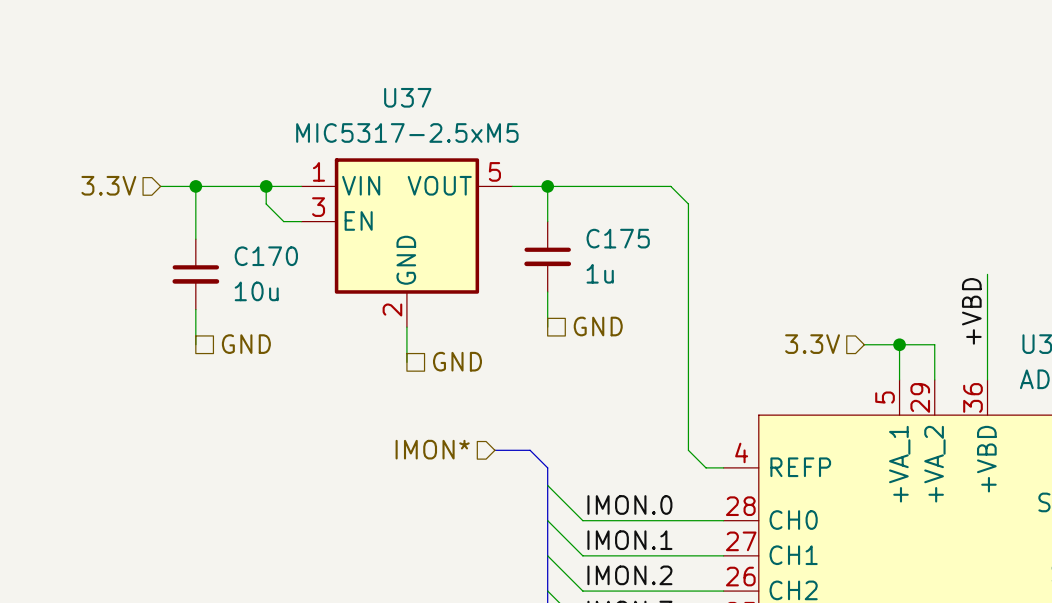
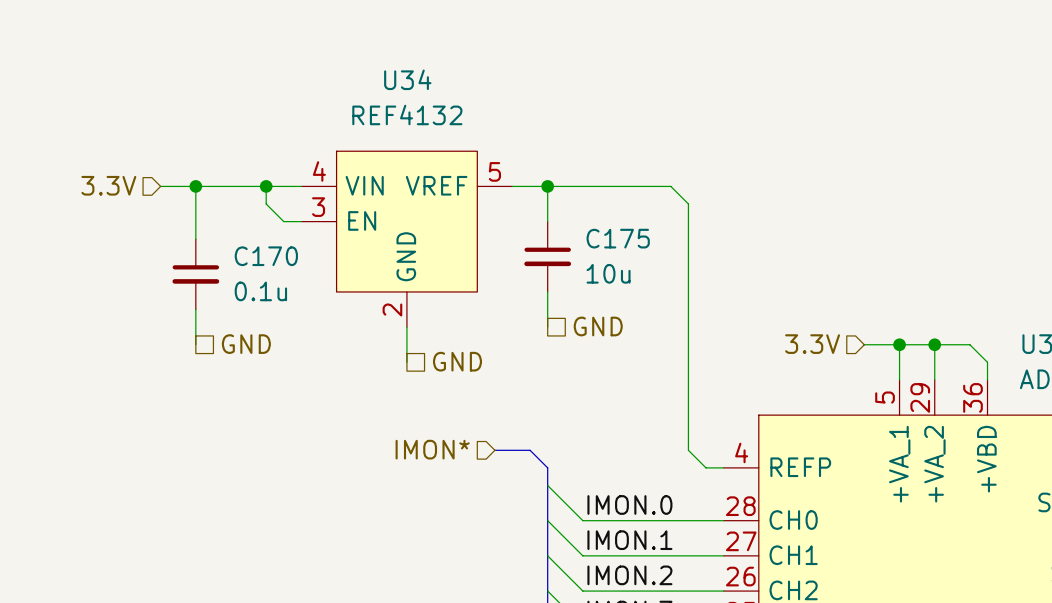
U34: none -> REF4132 (406, 239)
U37: MIC5317-2.5xM5 (406, 242) -> none
C175 value: 1u (600, 273) -> 10u (608, 273)
wire: (987, 274) (987, 362) -> (934, 344) (969, 344) (987, 362)
C170 value: 10u (256, 291) -> 0.1u (260, 291)
label: +VBD (971, 311) -> none
junction: none -> (934, 344)

